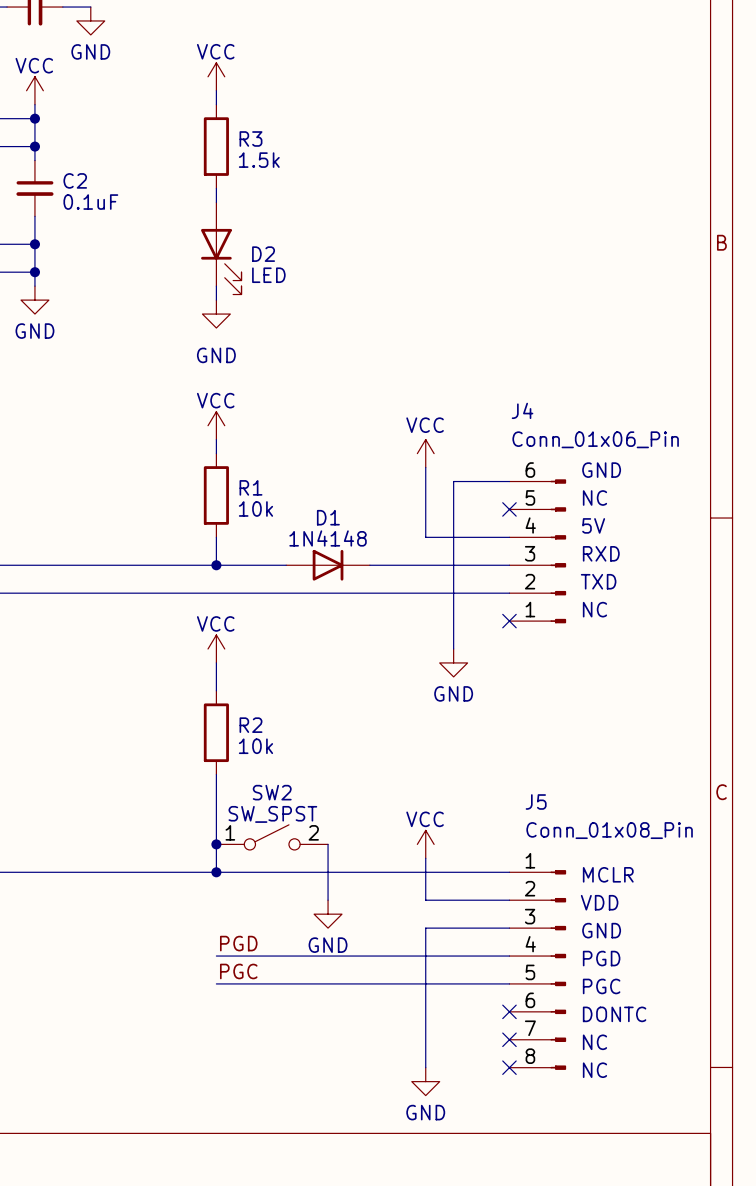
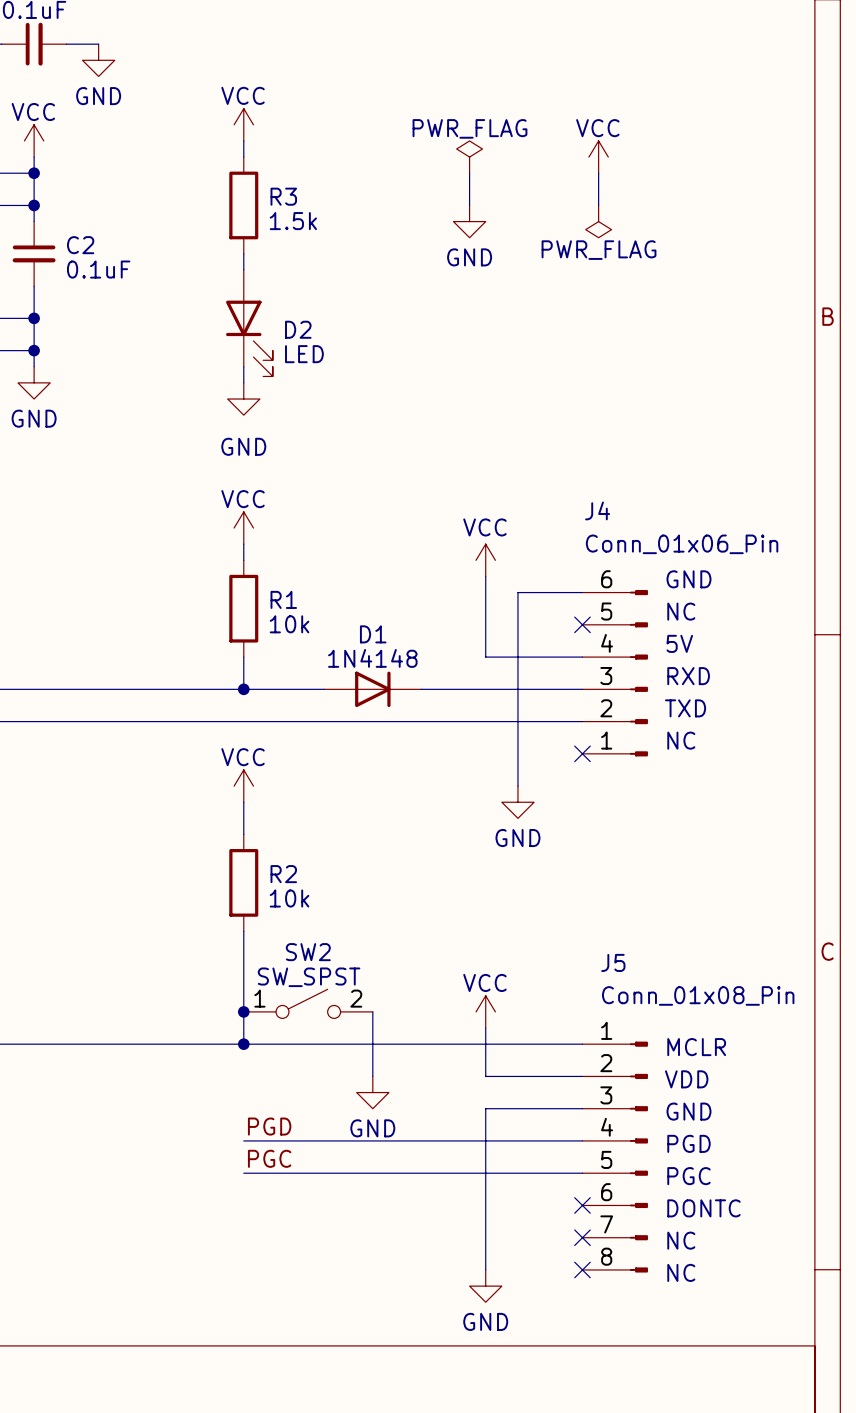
power symbol: none -> PWR_FLAG (469, 157)
power symbol: none -> VCC (598, 157)
wire: none -> (469, 173) (469, 205)
wire: none -> (598, 173) (598, 205)
power symbol: none -> GND (469, 221)
power symbol: none -> PWR_FLAG (598, 221)

